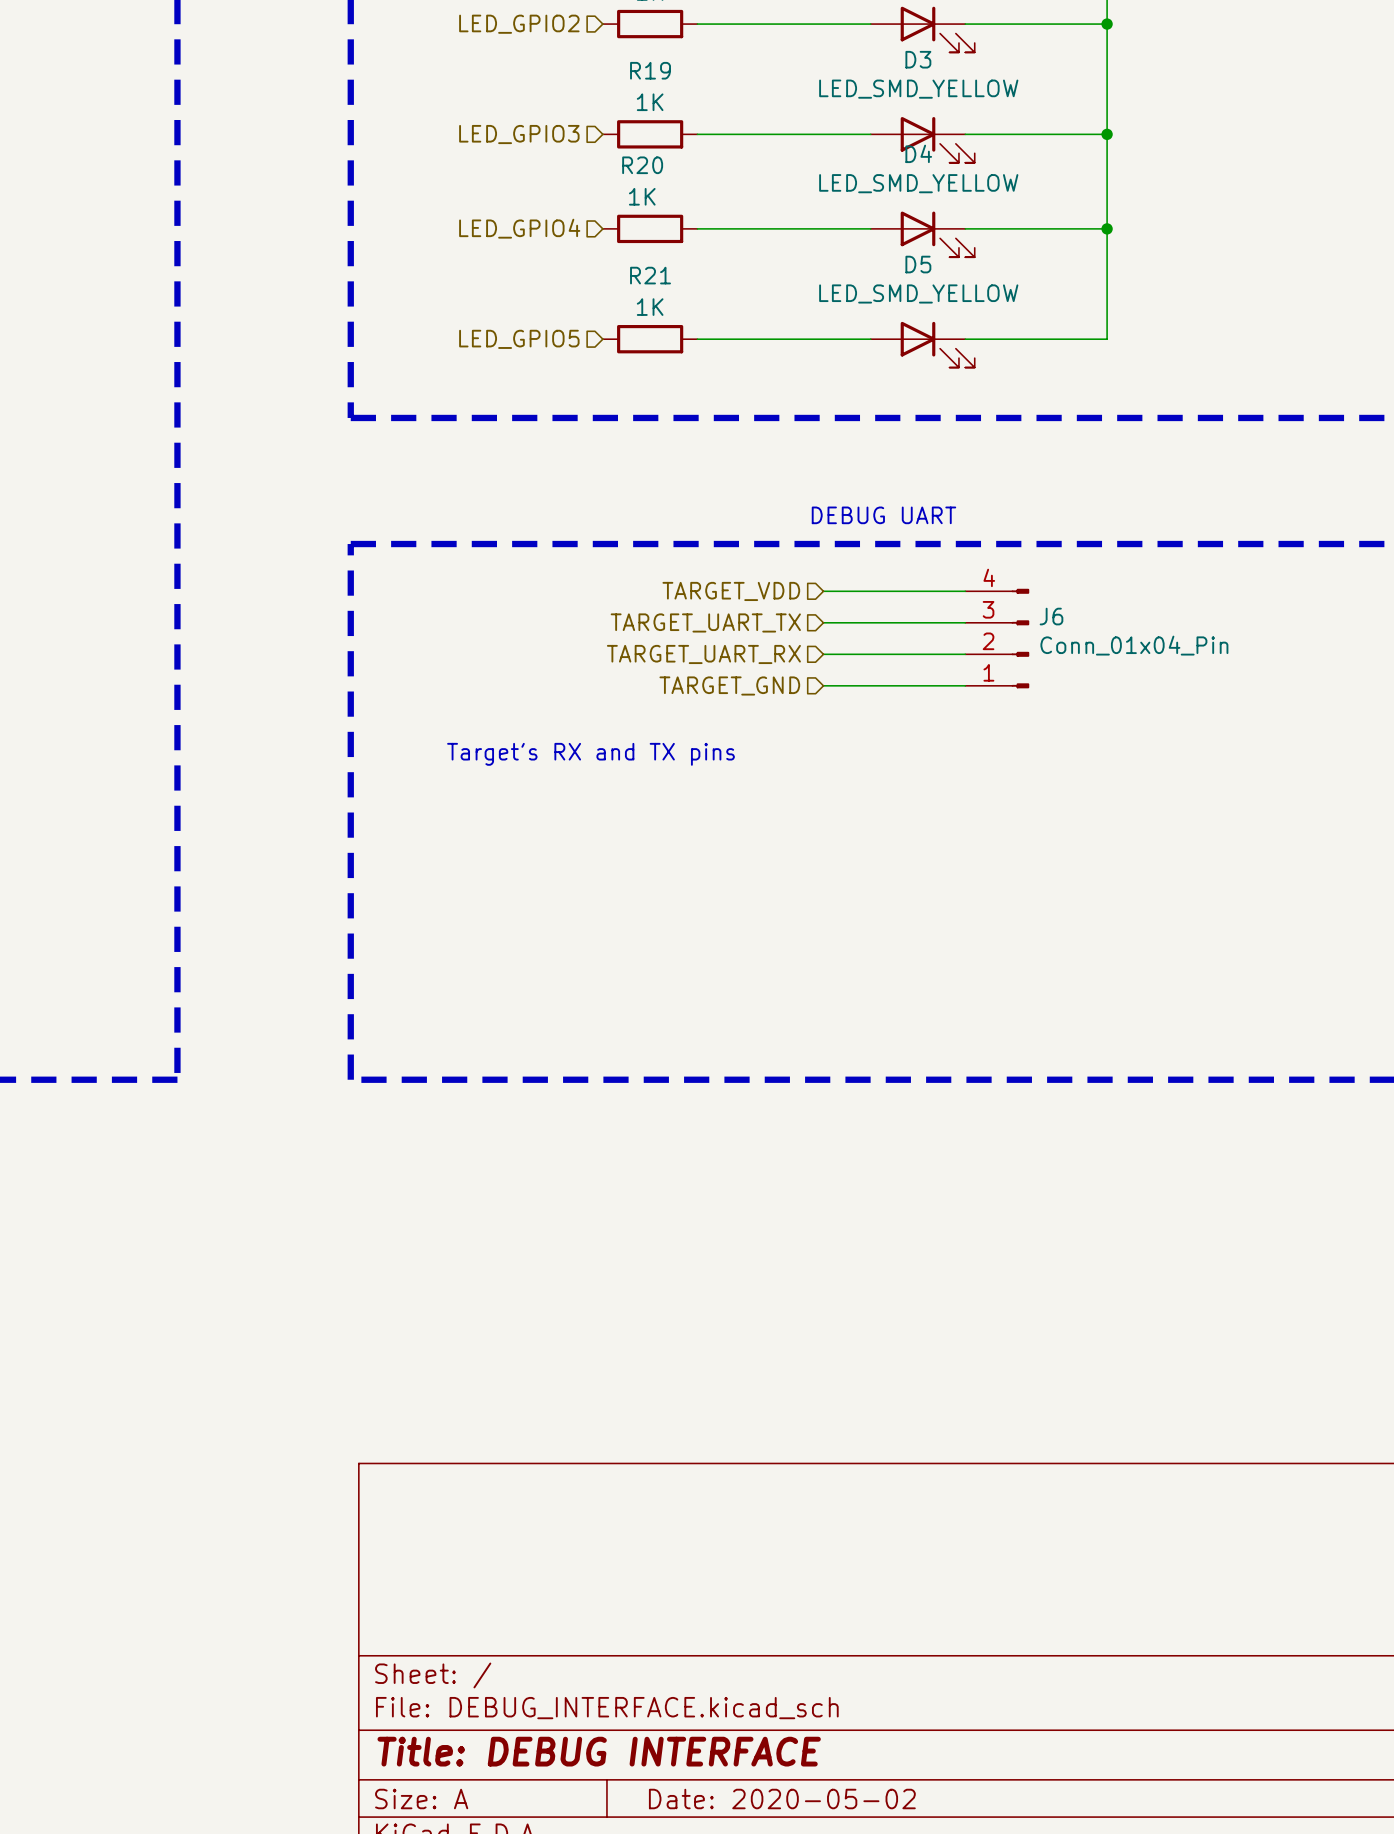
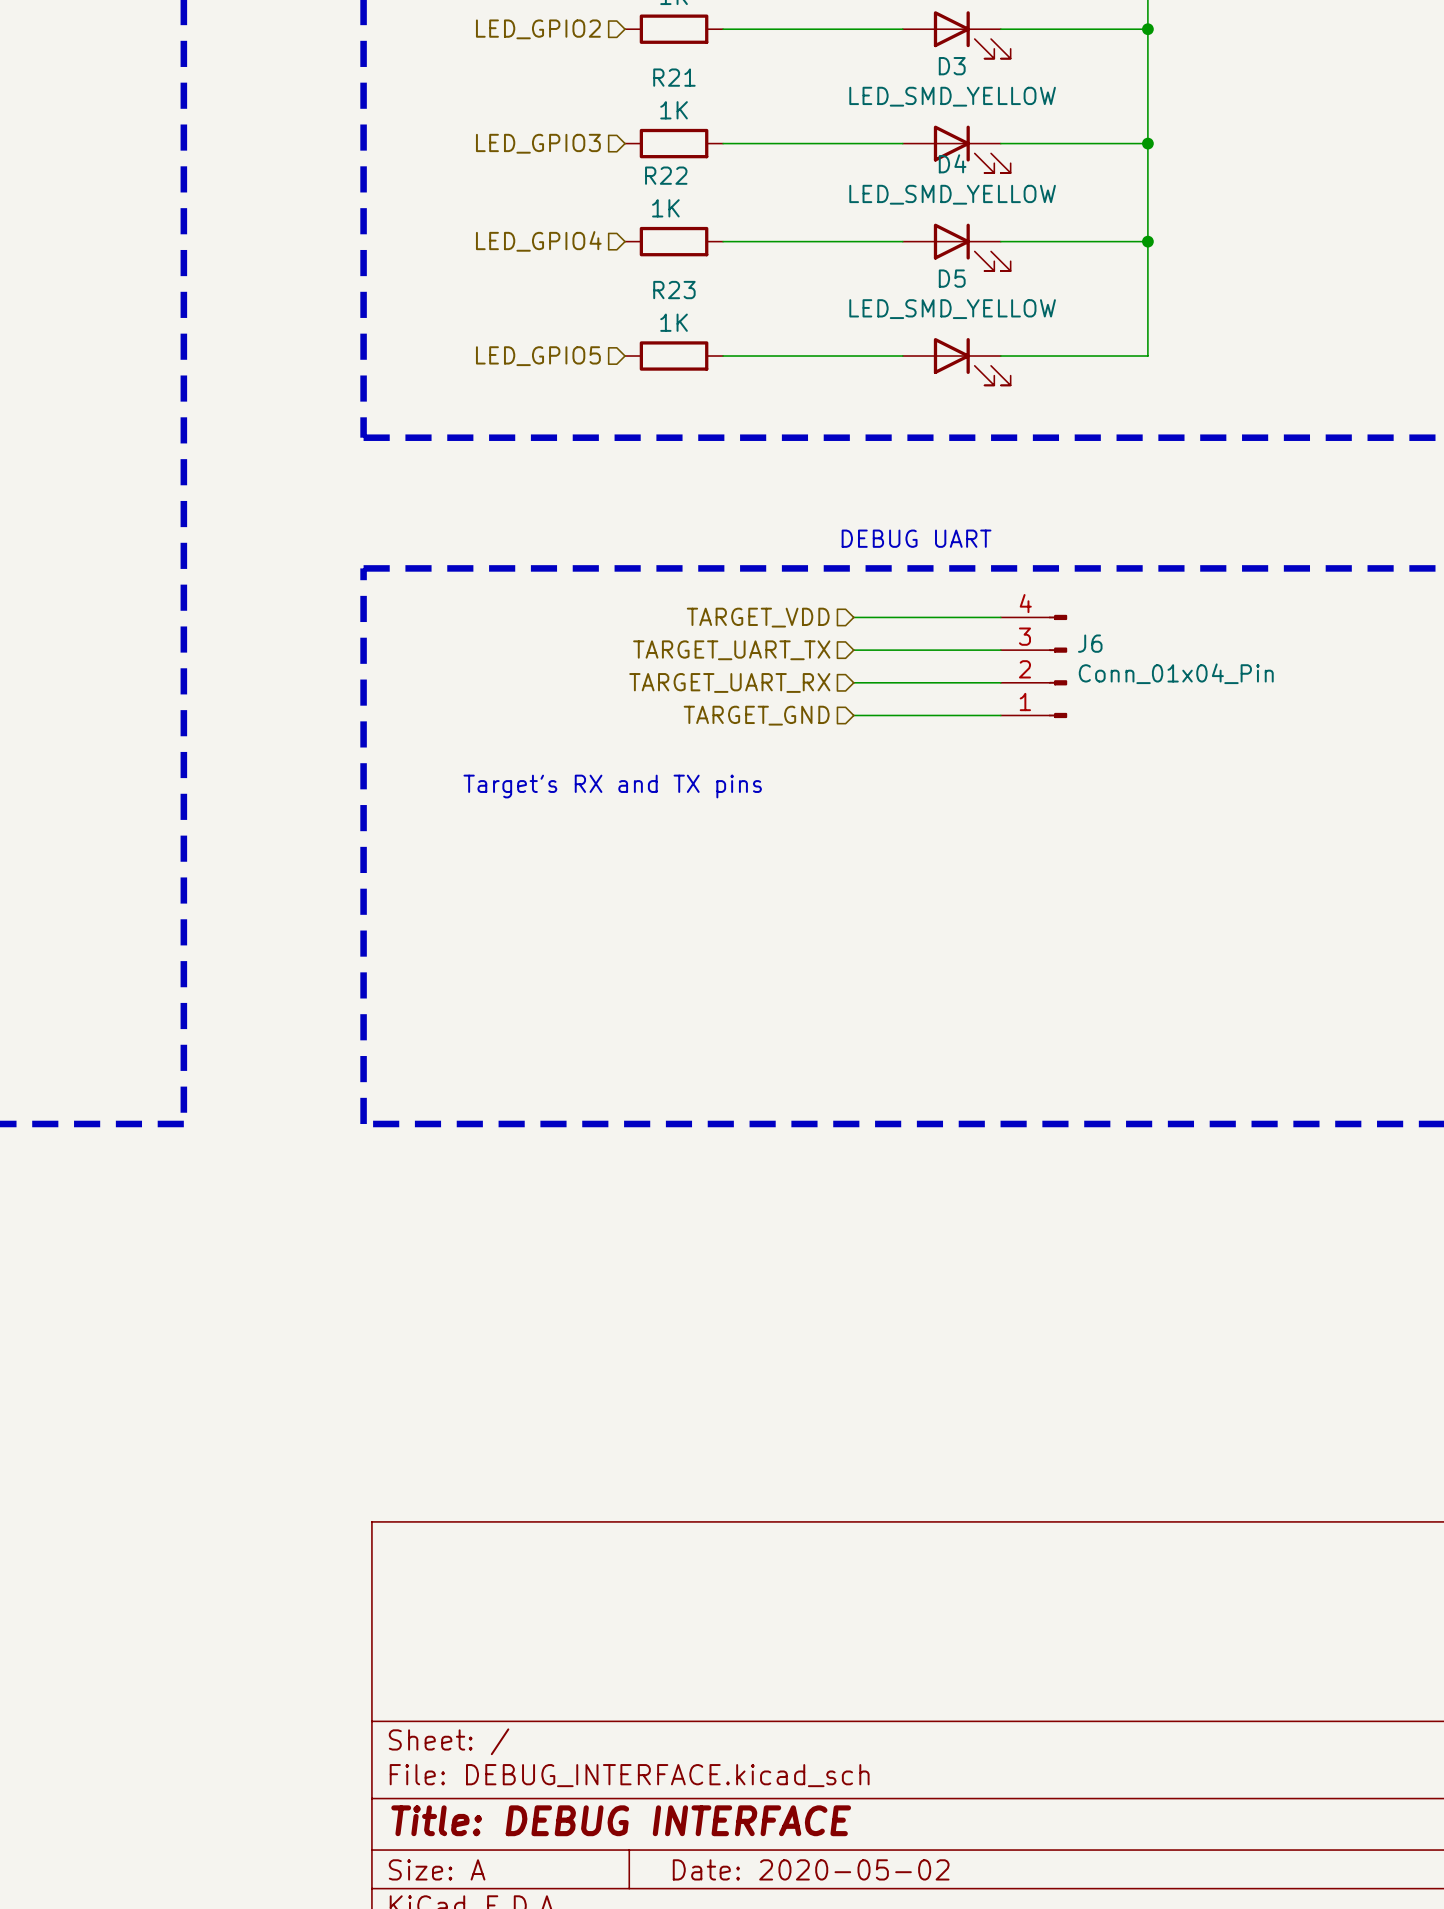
R19 name: R19 (650, 70) -> R21 (674, 77)
R20 name: R20 (642, 165) -> R22 (666, 175)
R21 name: R21 (650, 275) -> R23 (674, 290)

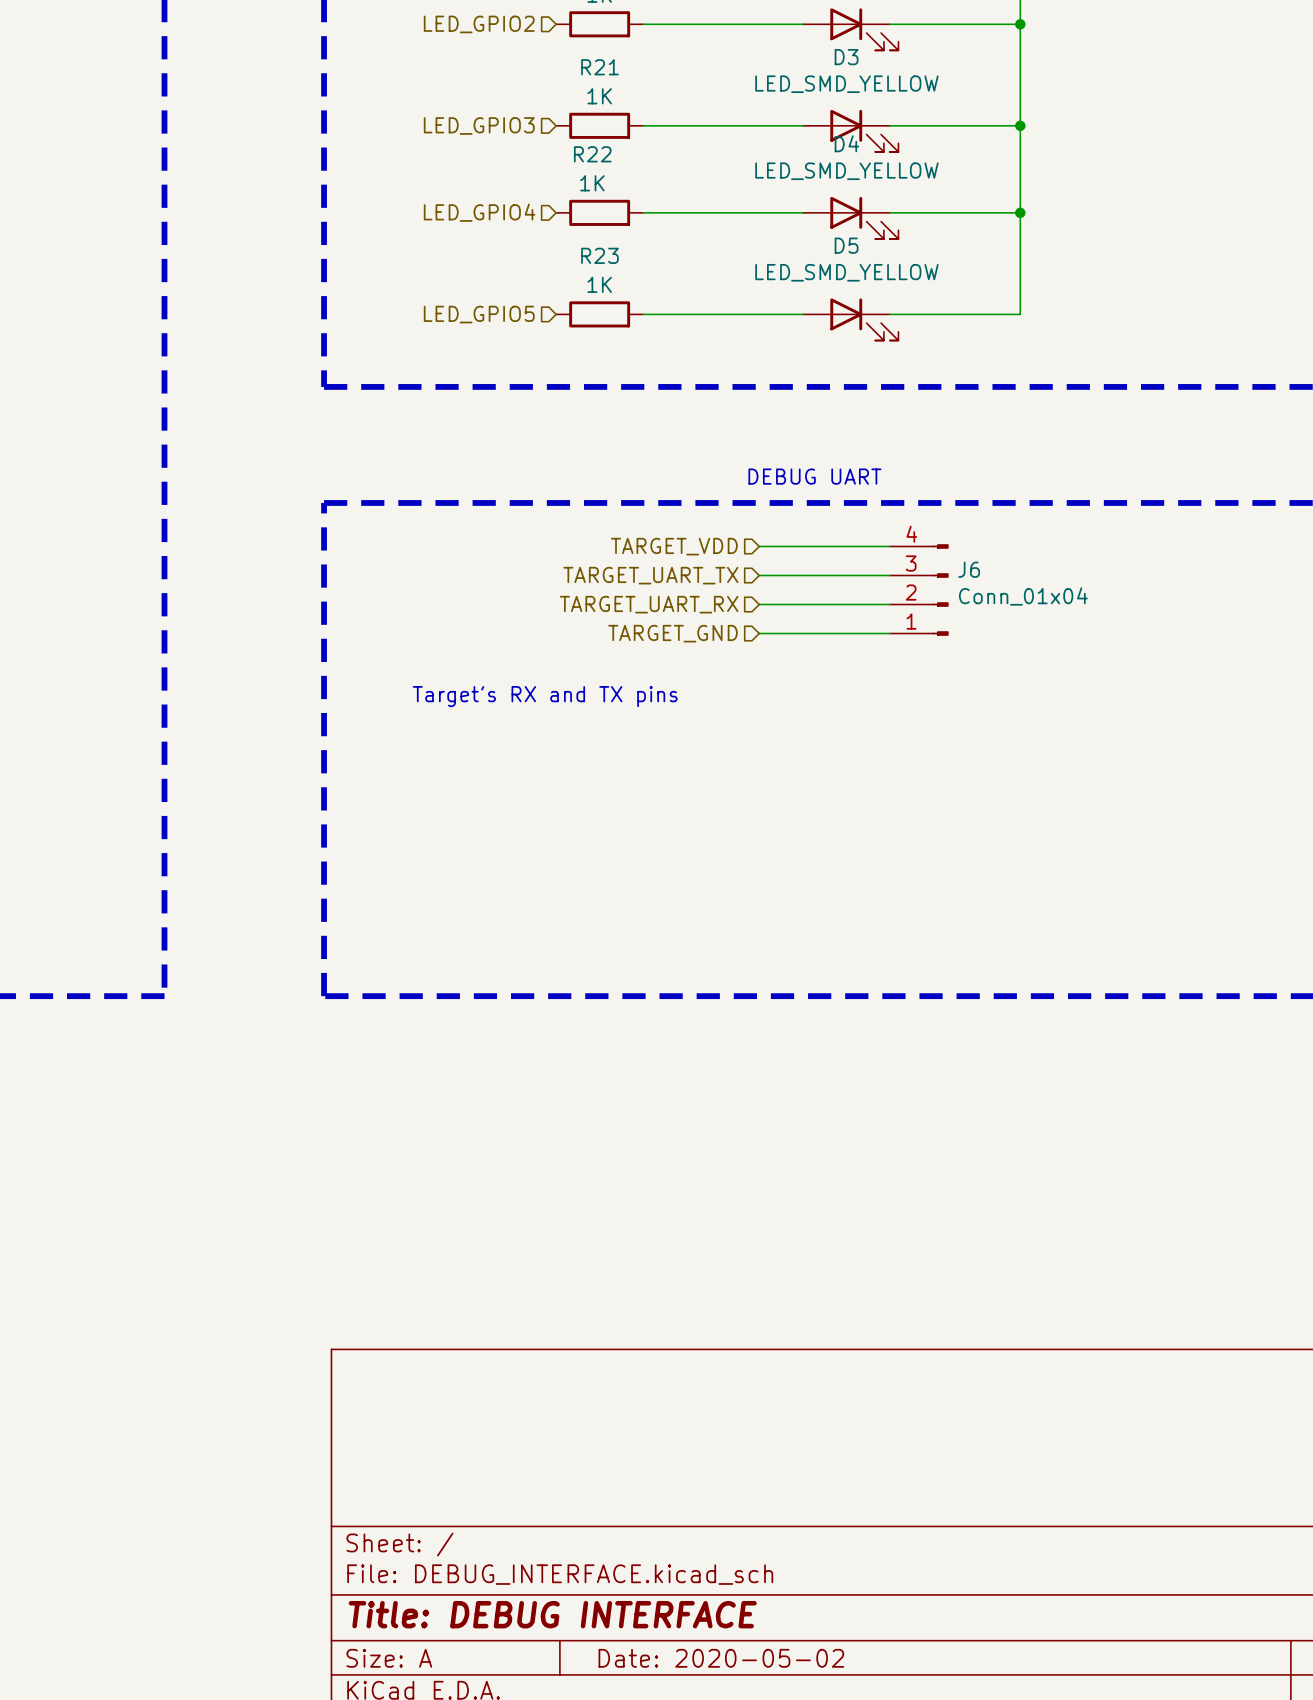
J6 value: Conn_01x04_Pin (1176, 673) -> Conn_01x04 (1023, 596)

